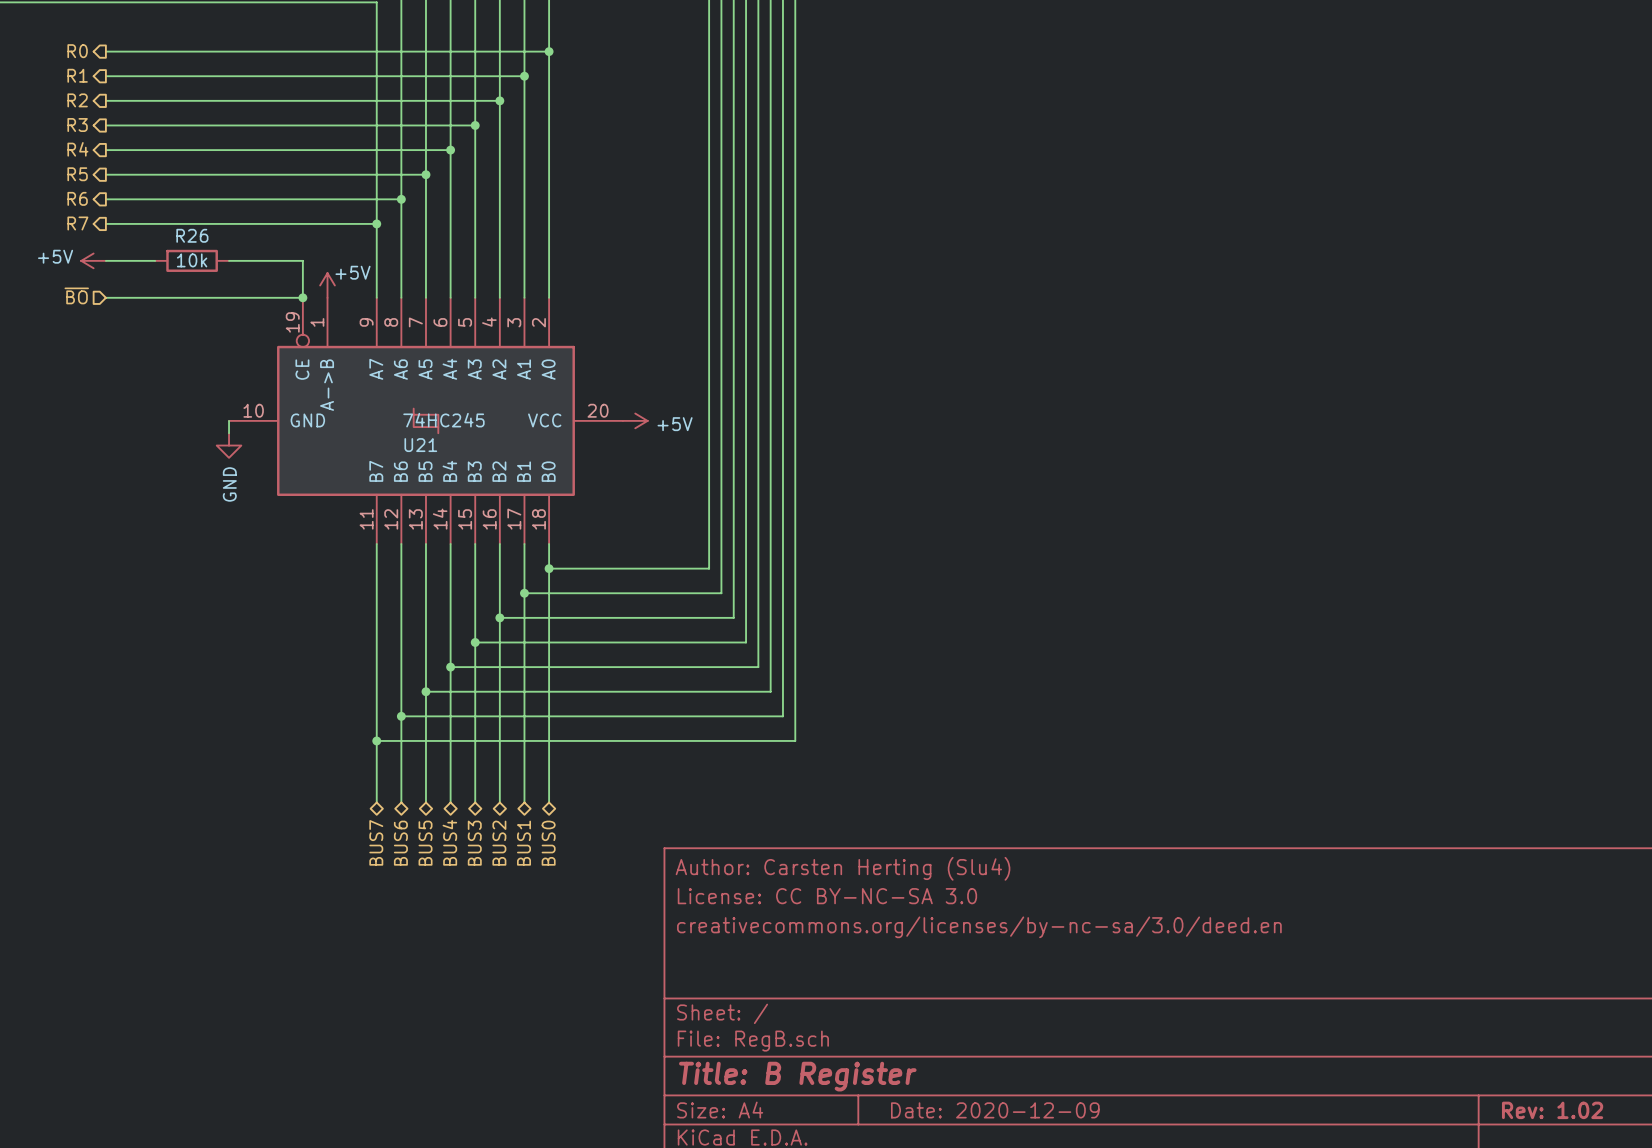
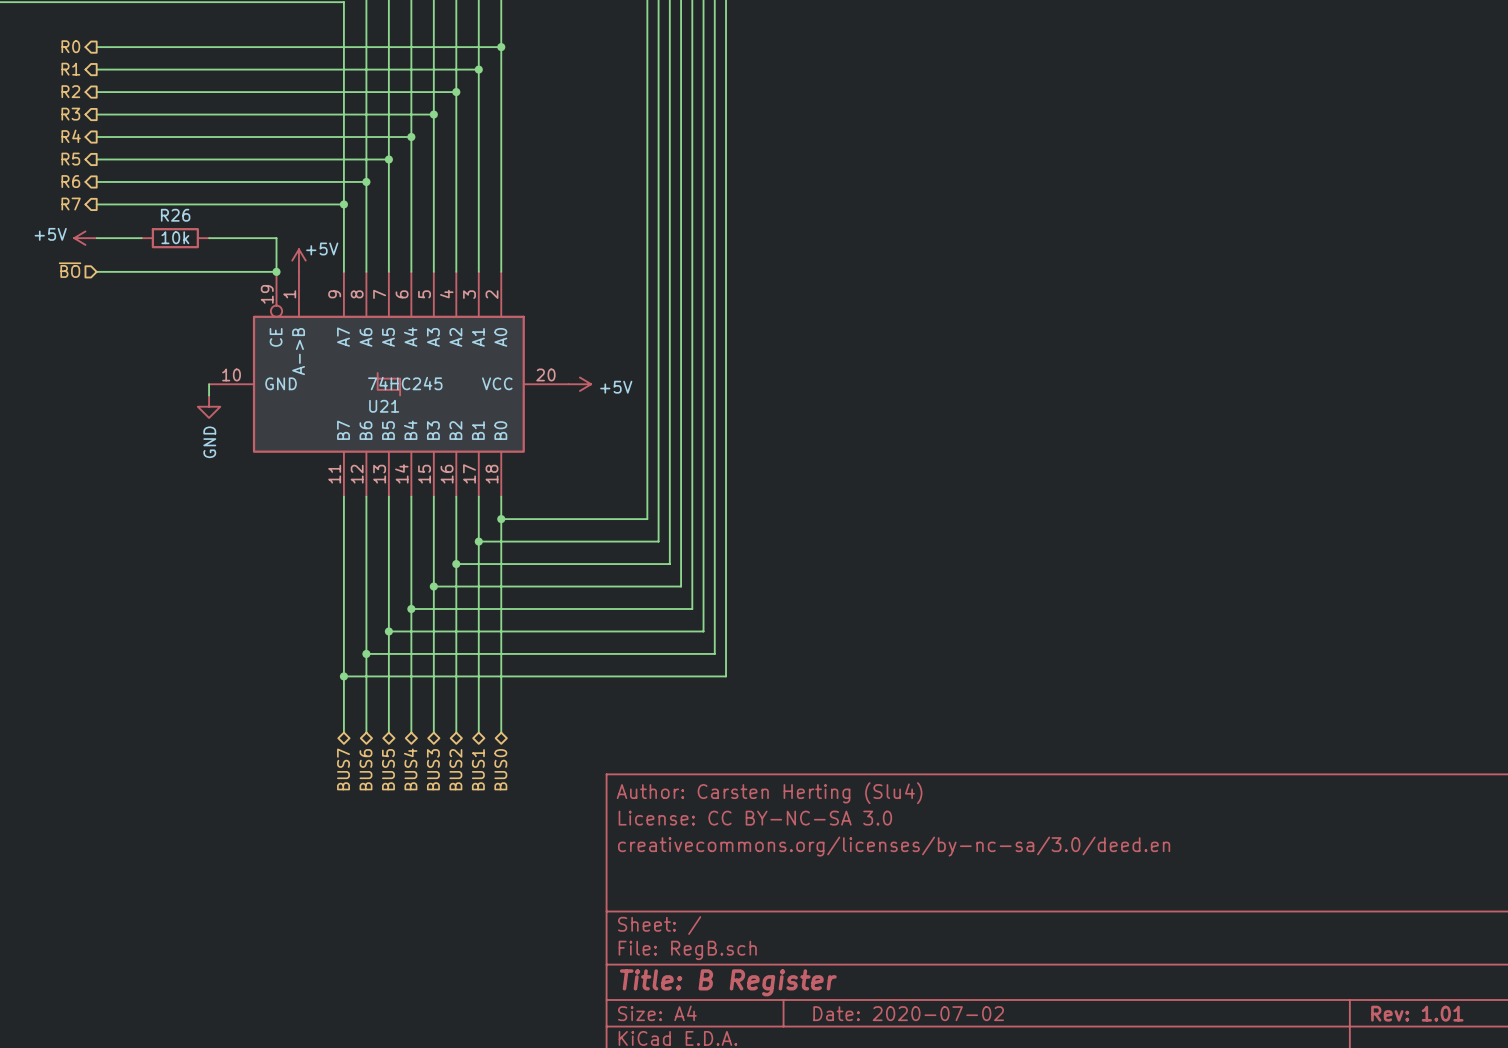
title block: Date: 2020-12-09 (995, 1110) -> Date: 2020-07-02 (908, 1013)
title block: Rev: 1.02 (1552, 1110) -> Rev: 1.01 (1417, 1013)

